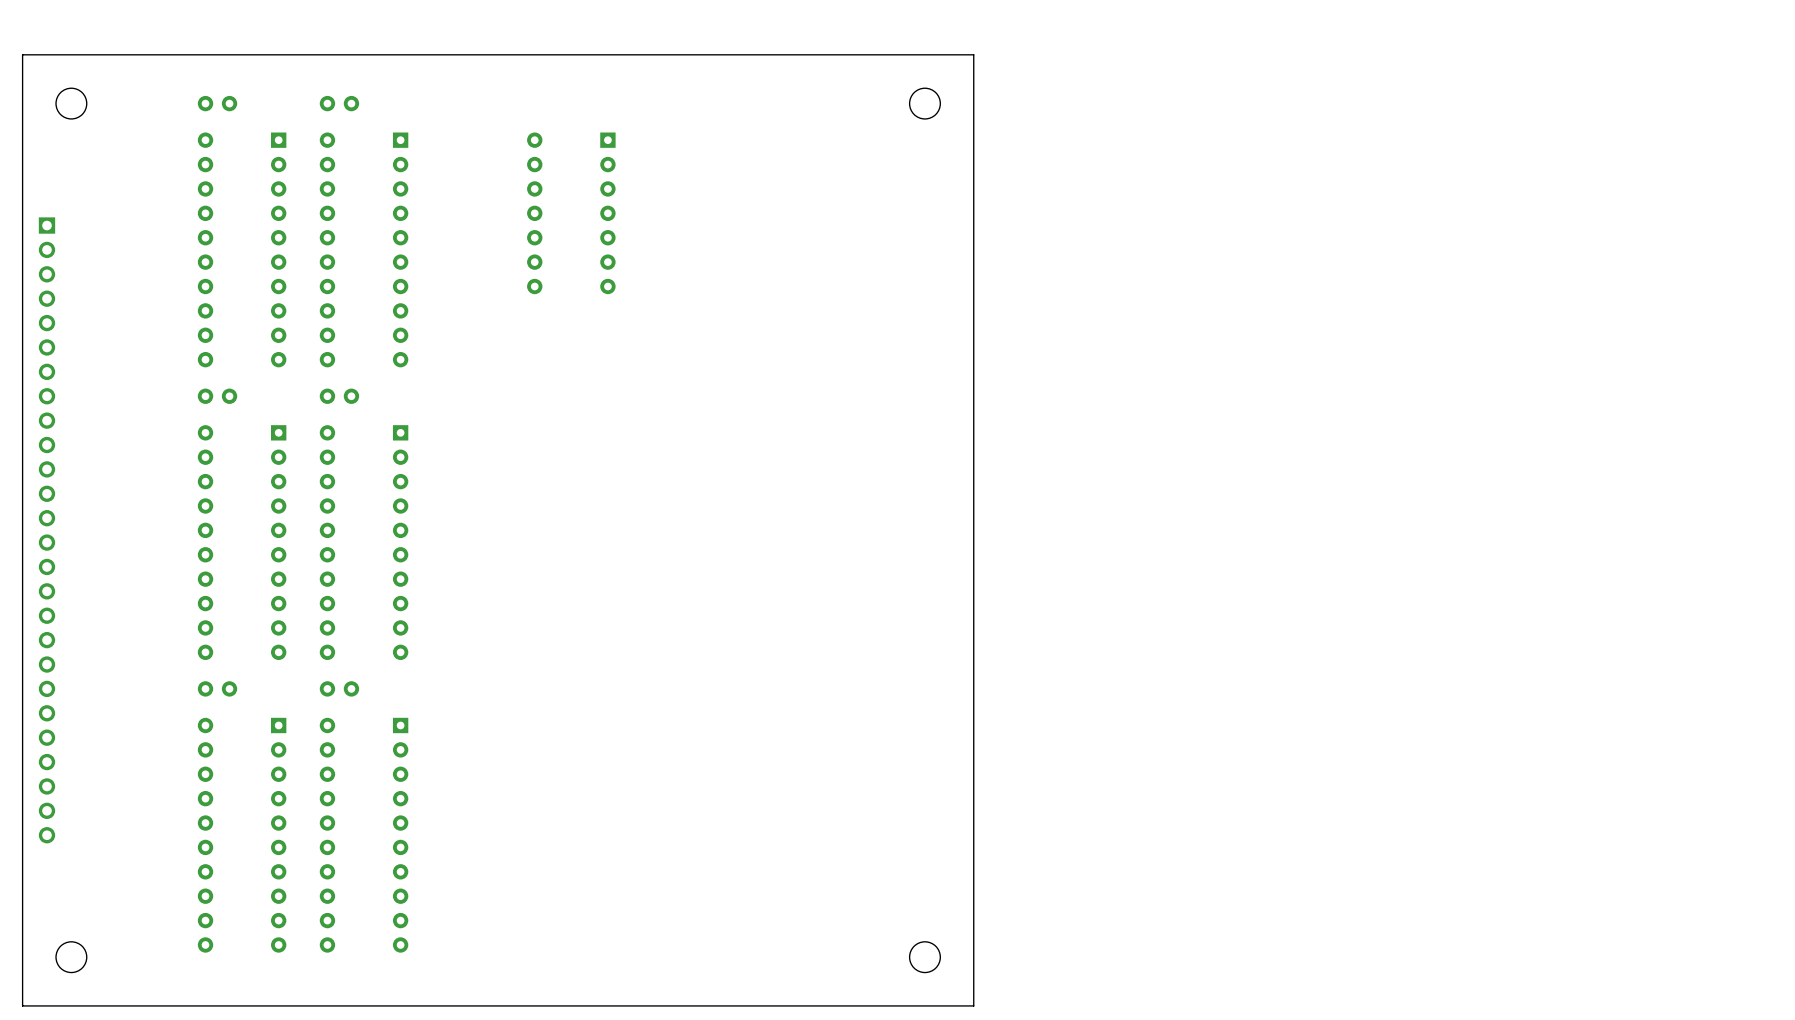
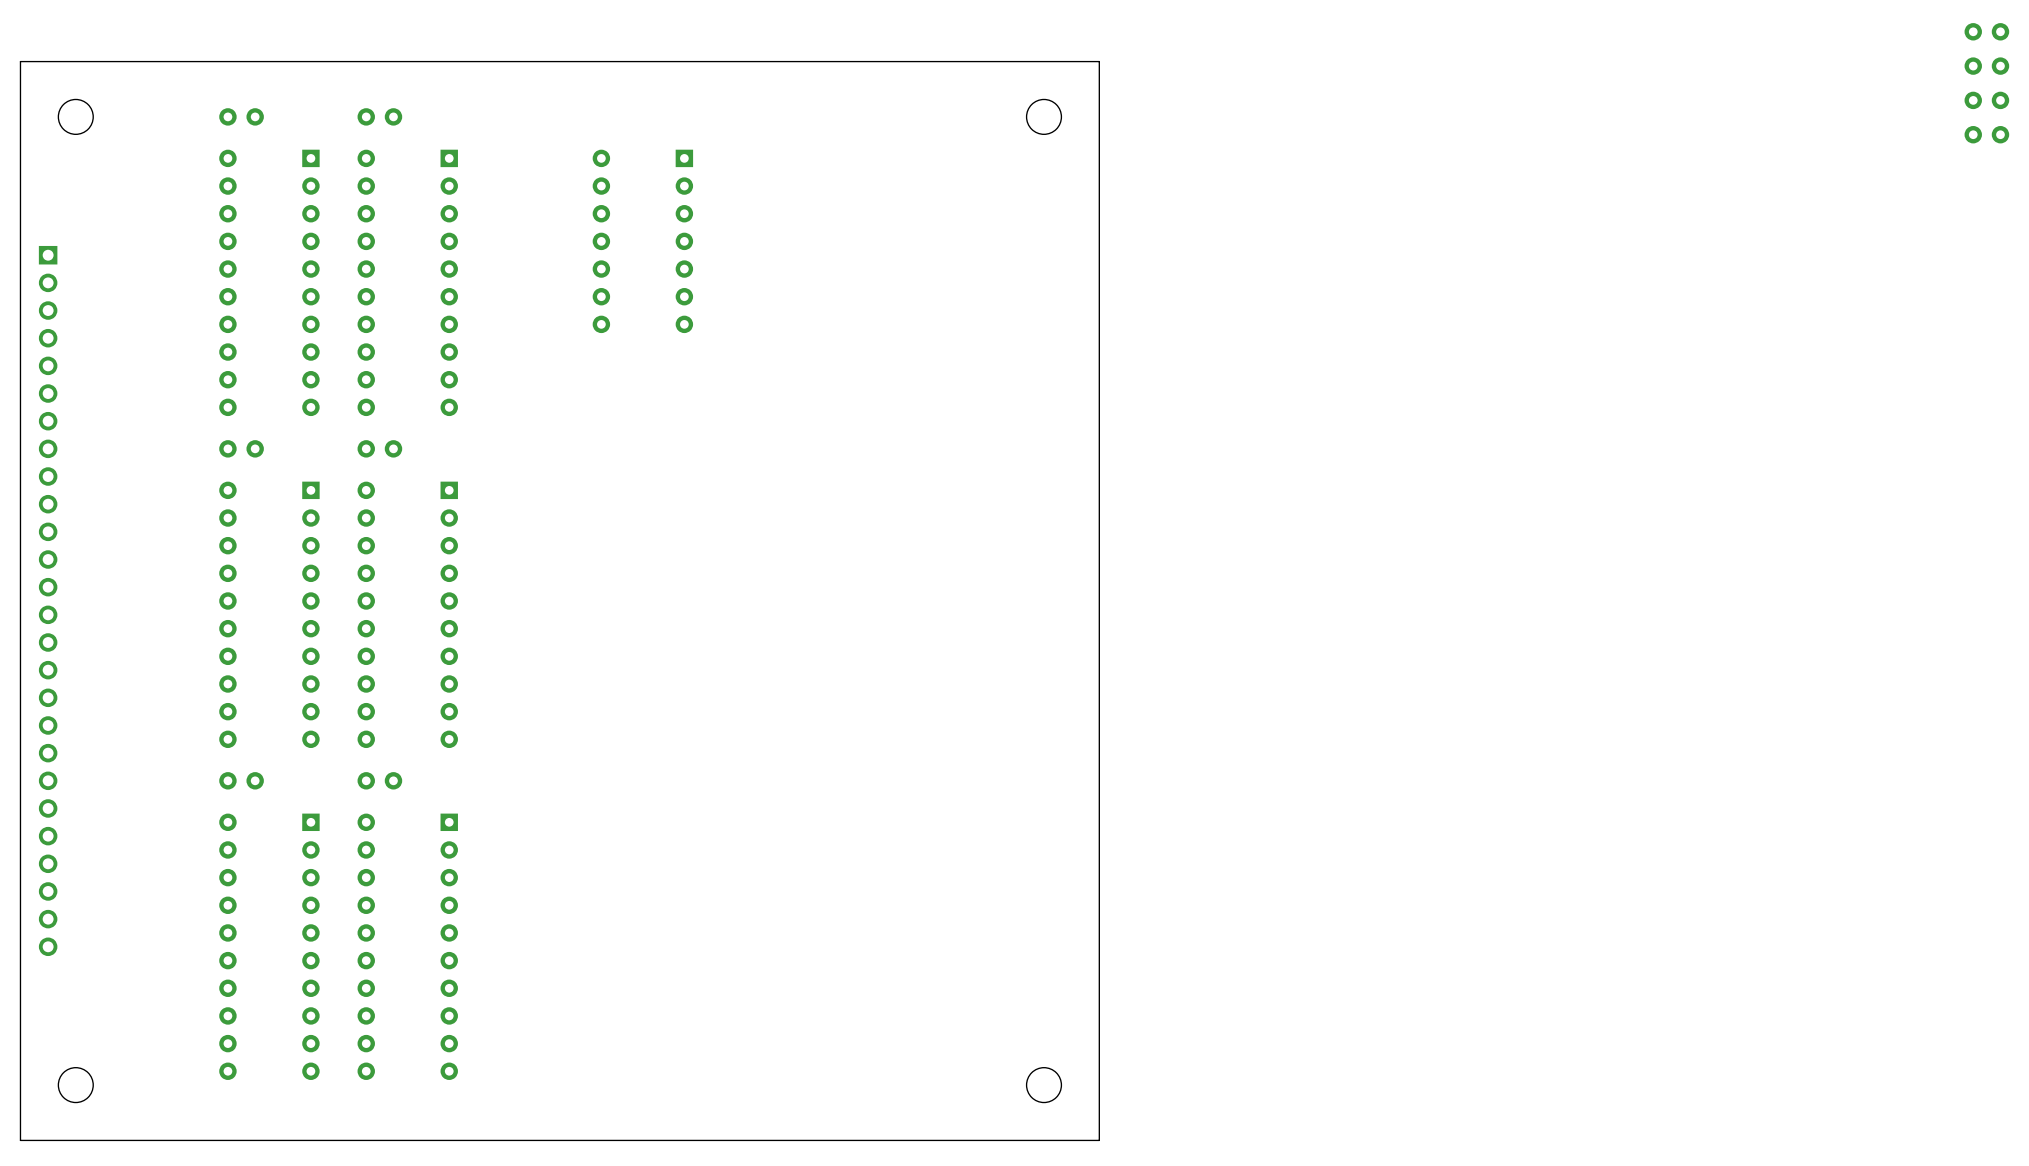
part: none -> (1986, 31)
part: none -> (1986, 66)
part: none -> (1986, 100)
part: none -> (1986, 134)

